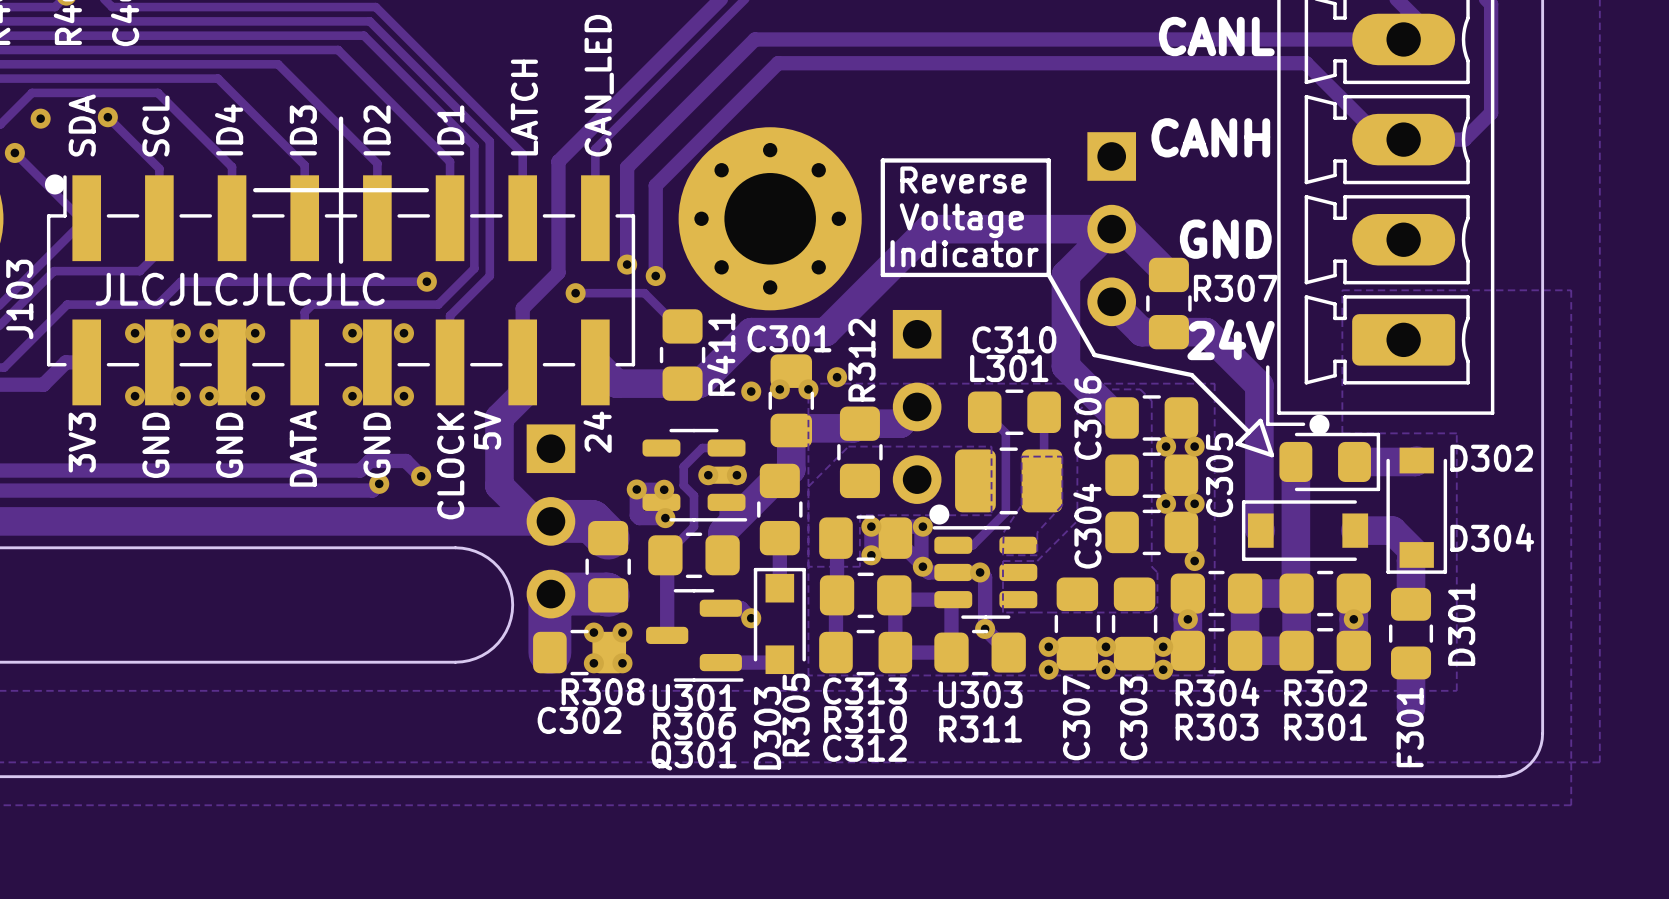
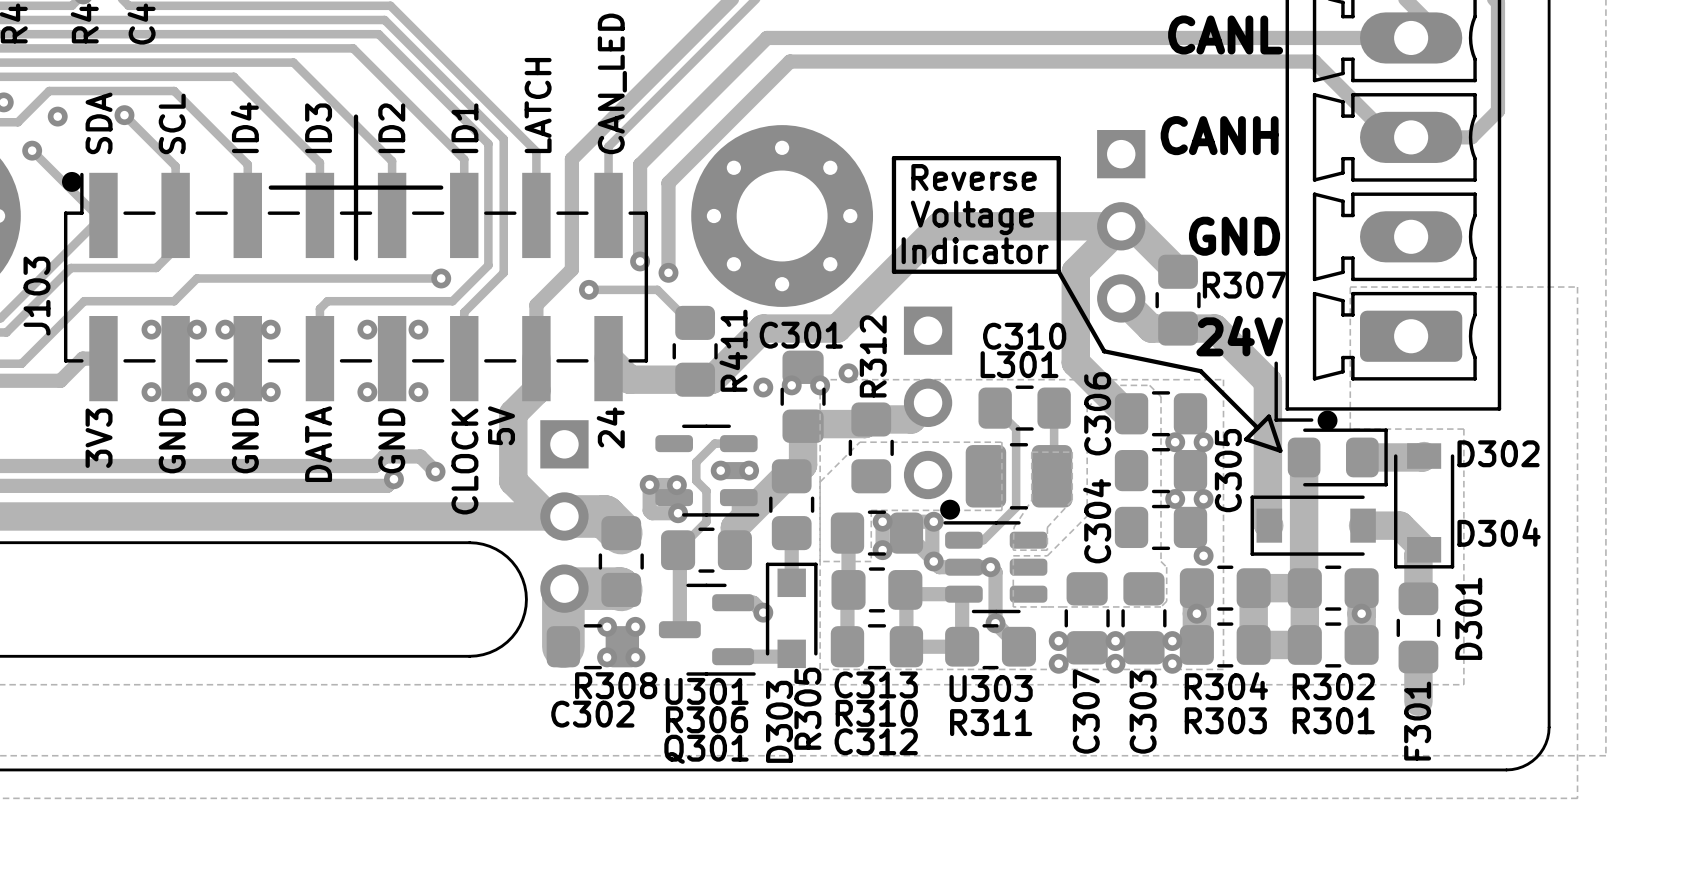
text: JLCJLCJLCJLC (240, 289) -> none

